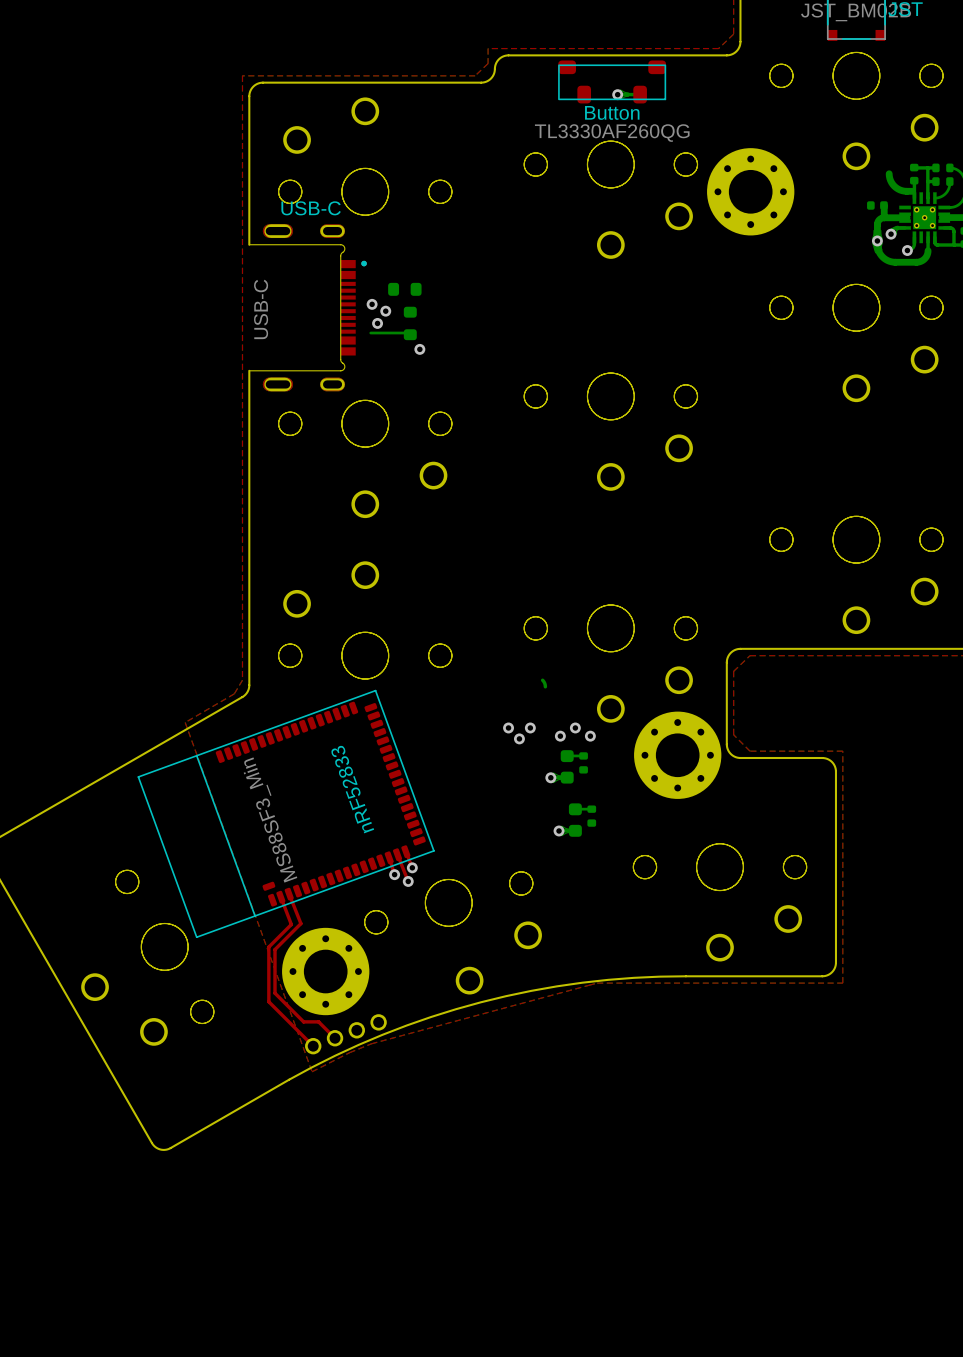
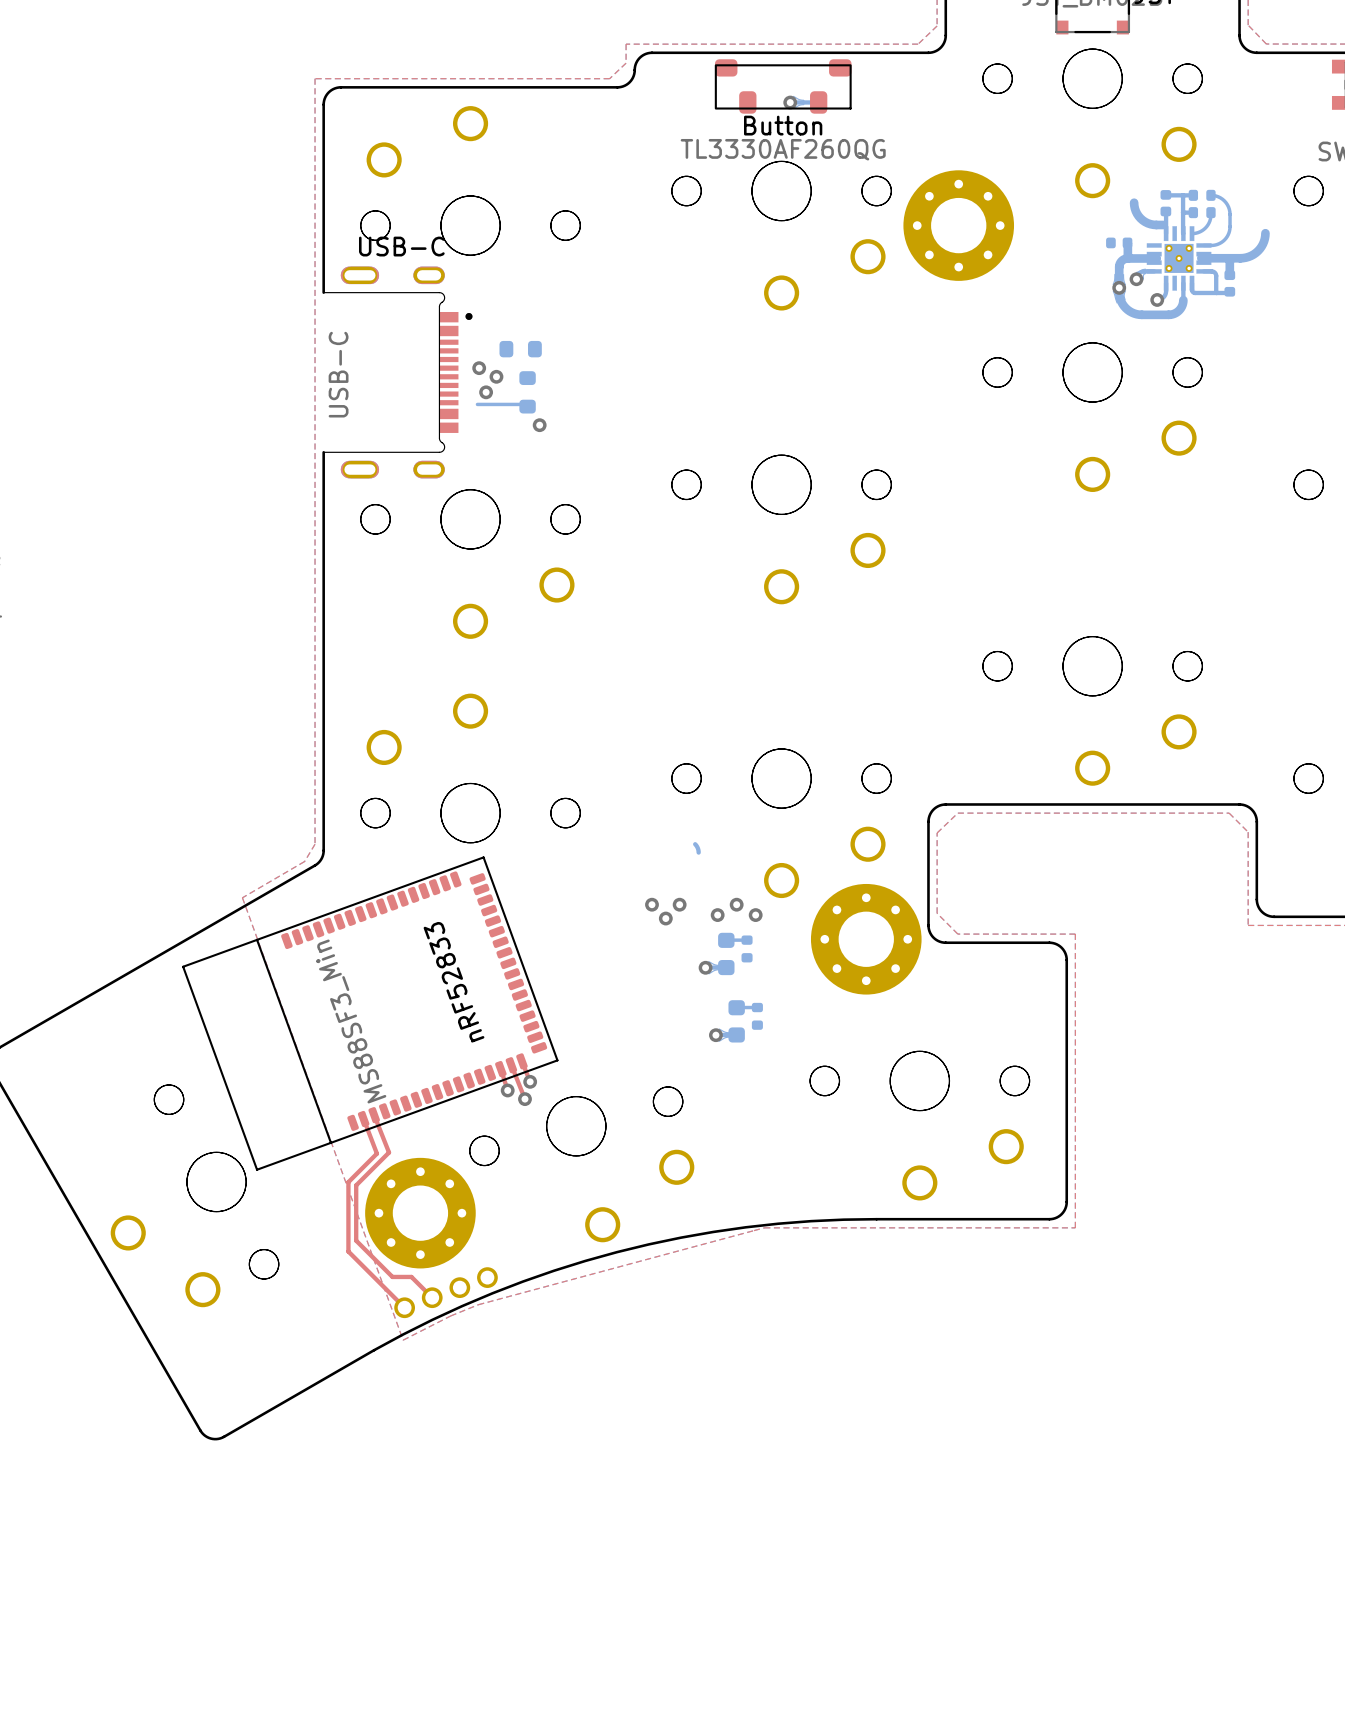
nRF52833 footprint: [137, 689, 435, 939] -> [182, 856, 559, 1171]

